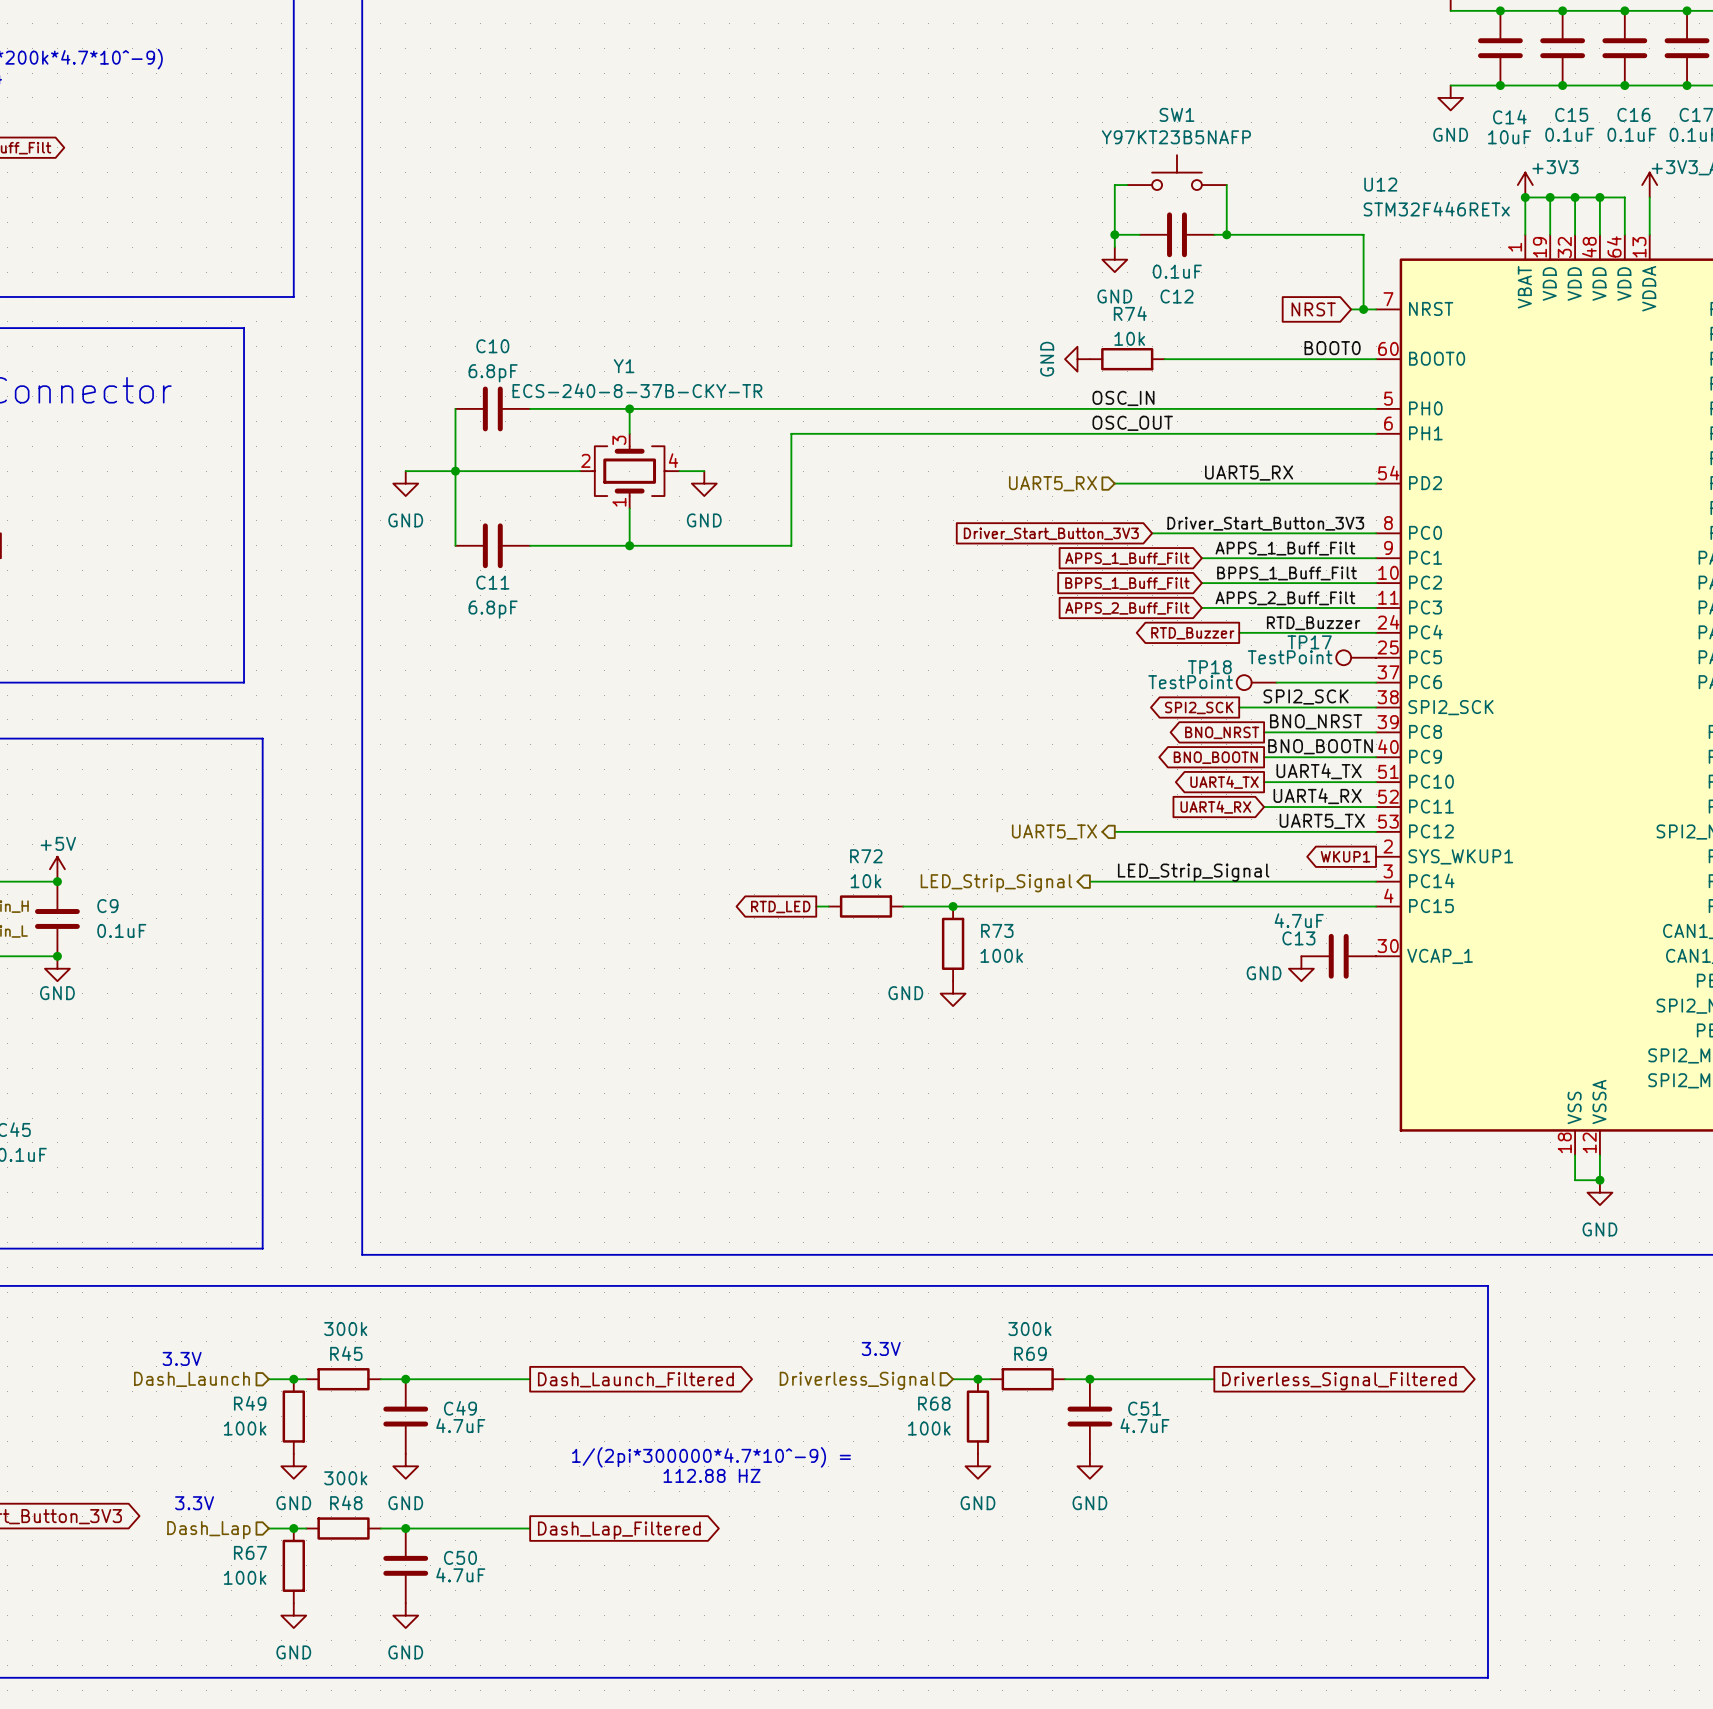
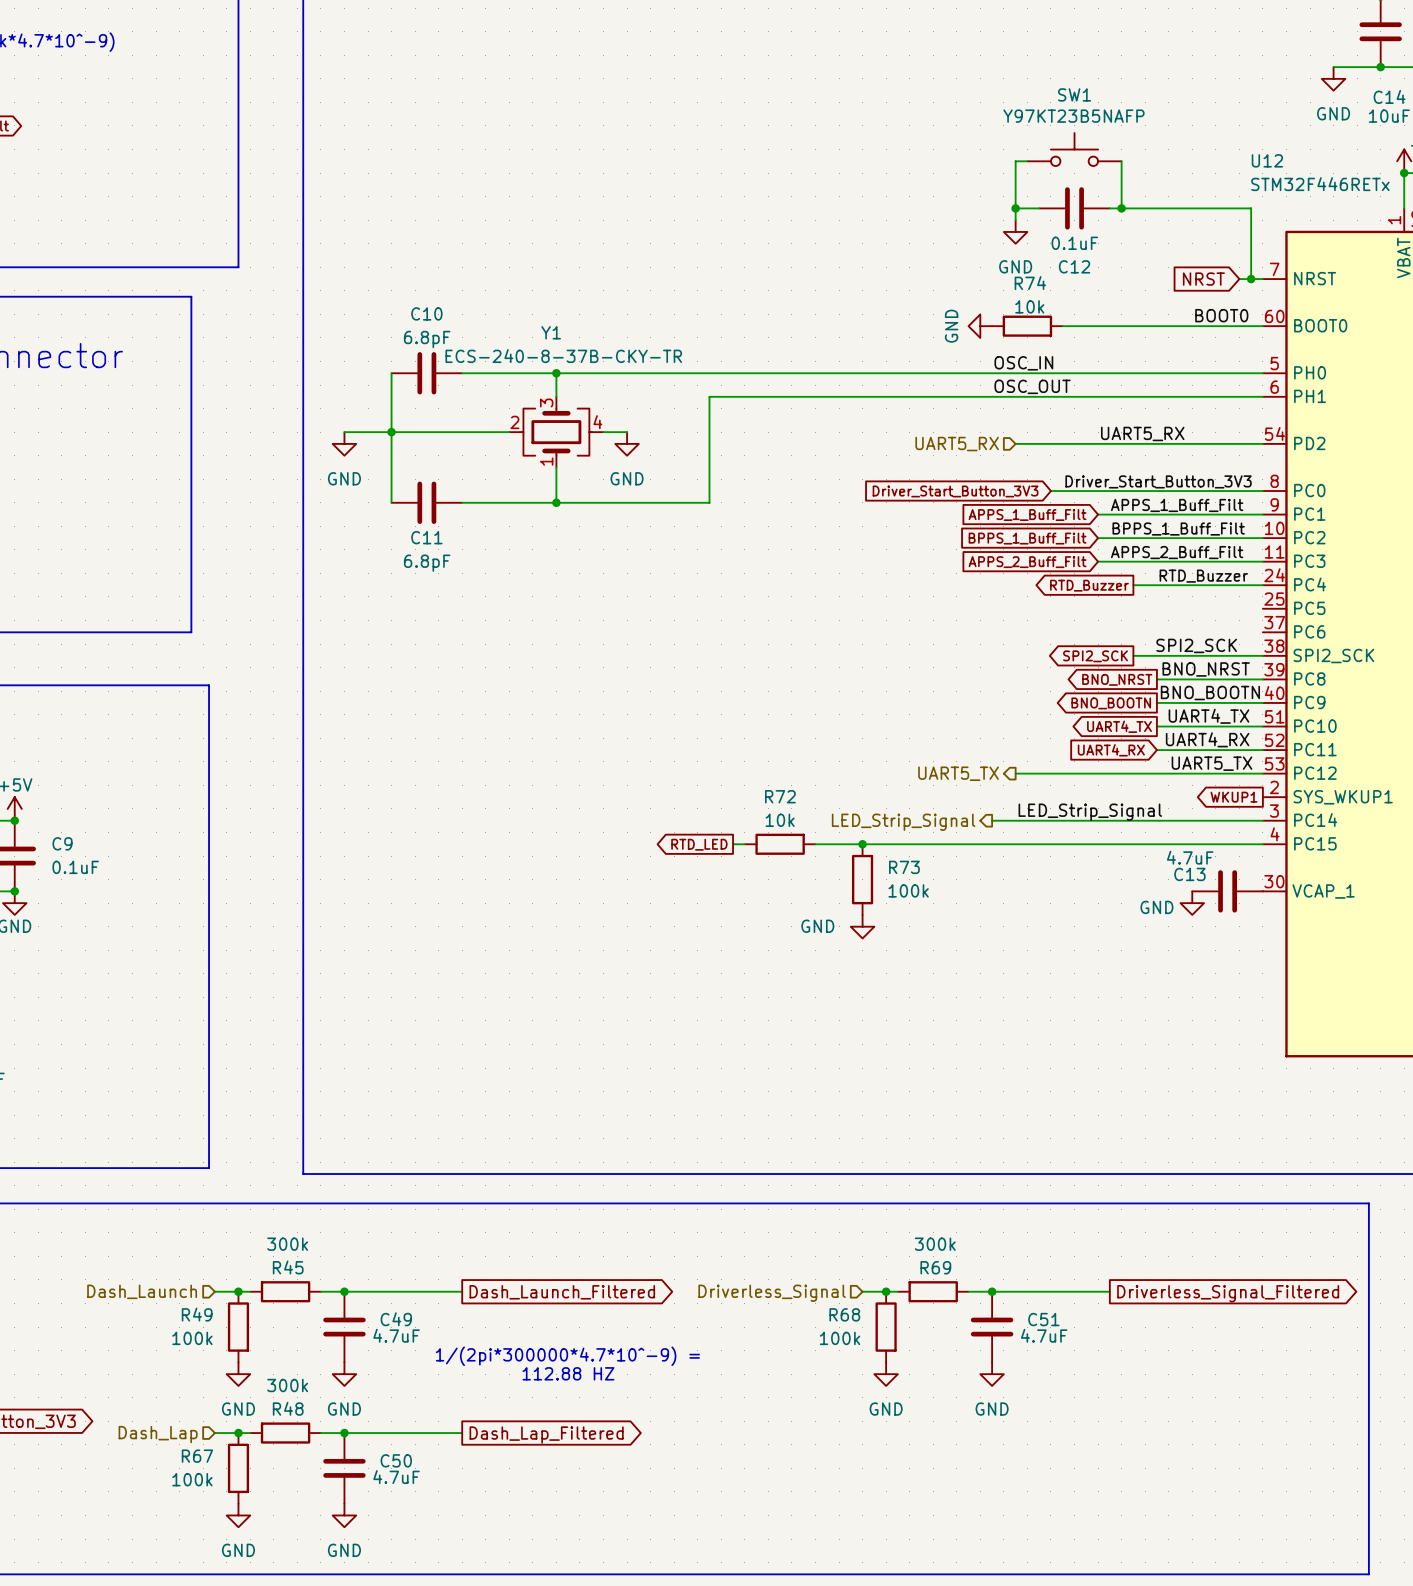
TP17: TestPoint (1356, 657) -> none
TP18: TestPoint (1256, 682) -> none
wire: (1276, 682) (1376, 682) -> none
text: 3.3V (881, 1348) -> none
text: 3.3V (182, 1358) -> none
text position: 1/(2pi*300000*4.7*10^-9) = (711, 1457) -> 1/(2pi*300000*4.7*10^-9) = (567, 1356)
text position: 112.88 HZ (712, 1475) -> 112.88 HZ (568, 1373)
text: 3.3V (194, 1503) -> none

